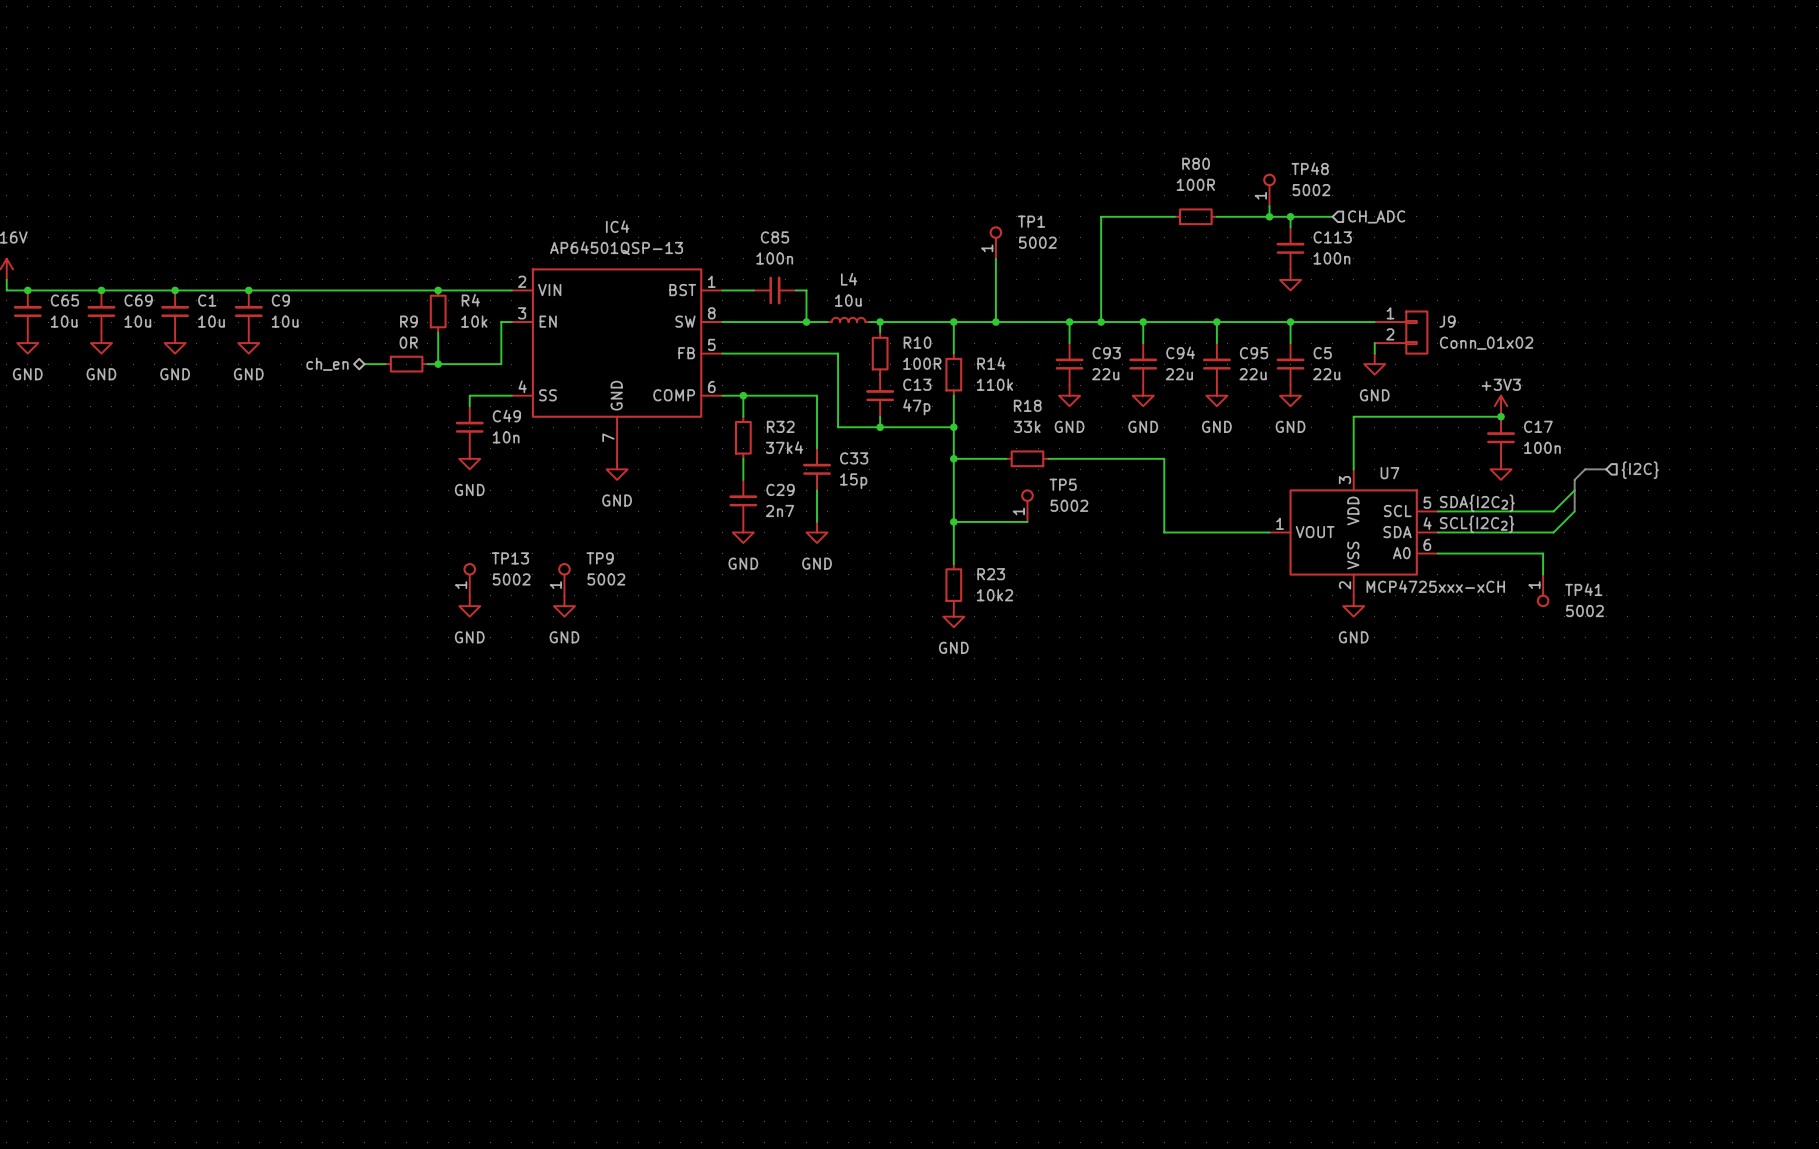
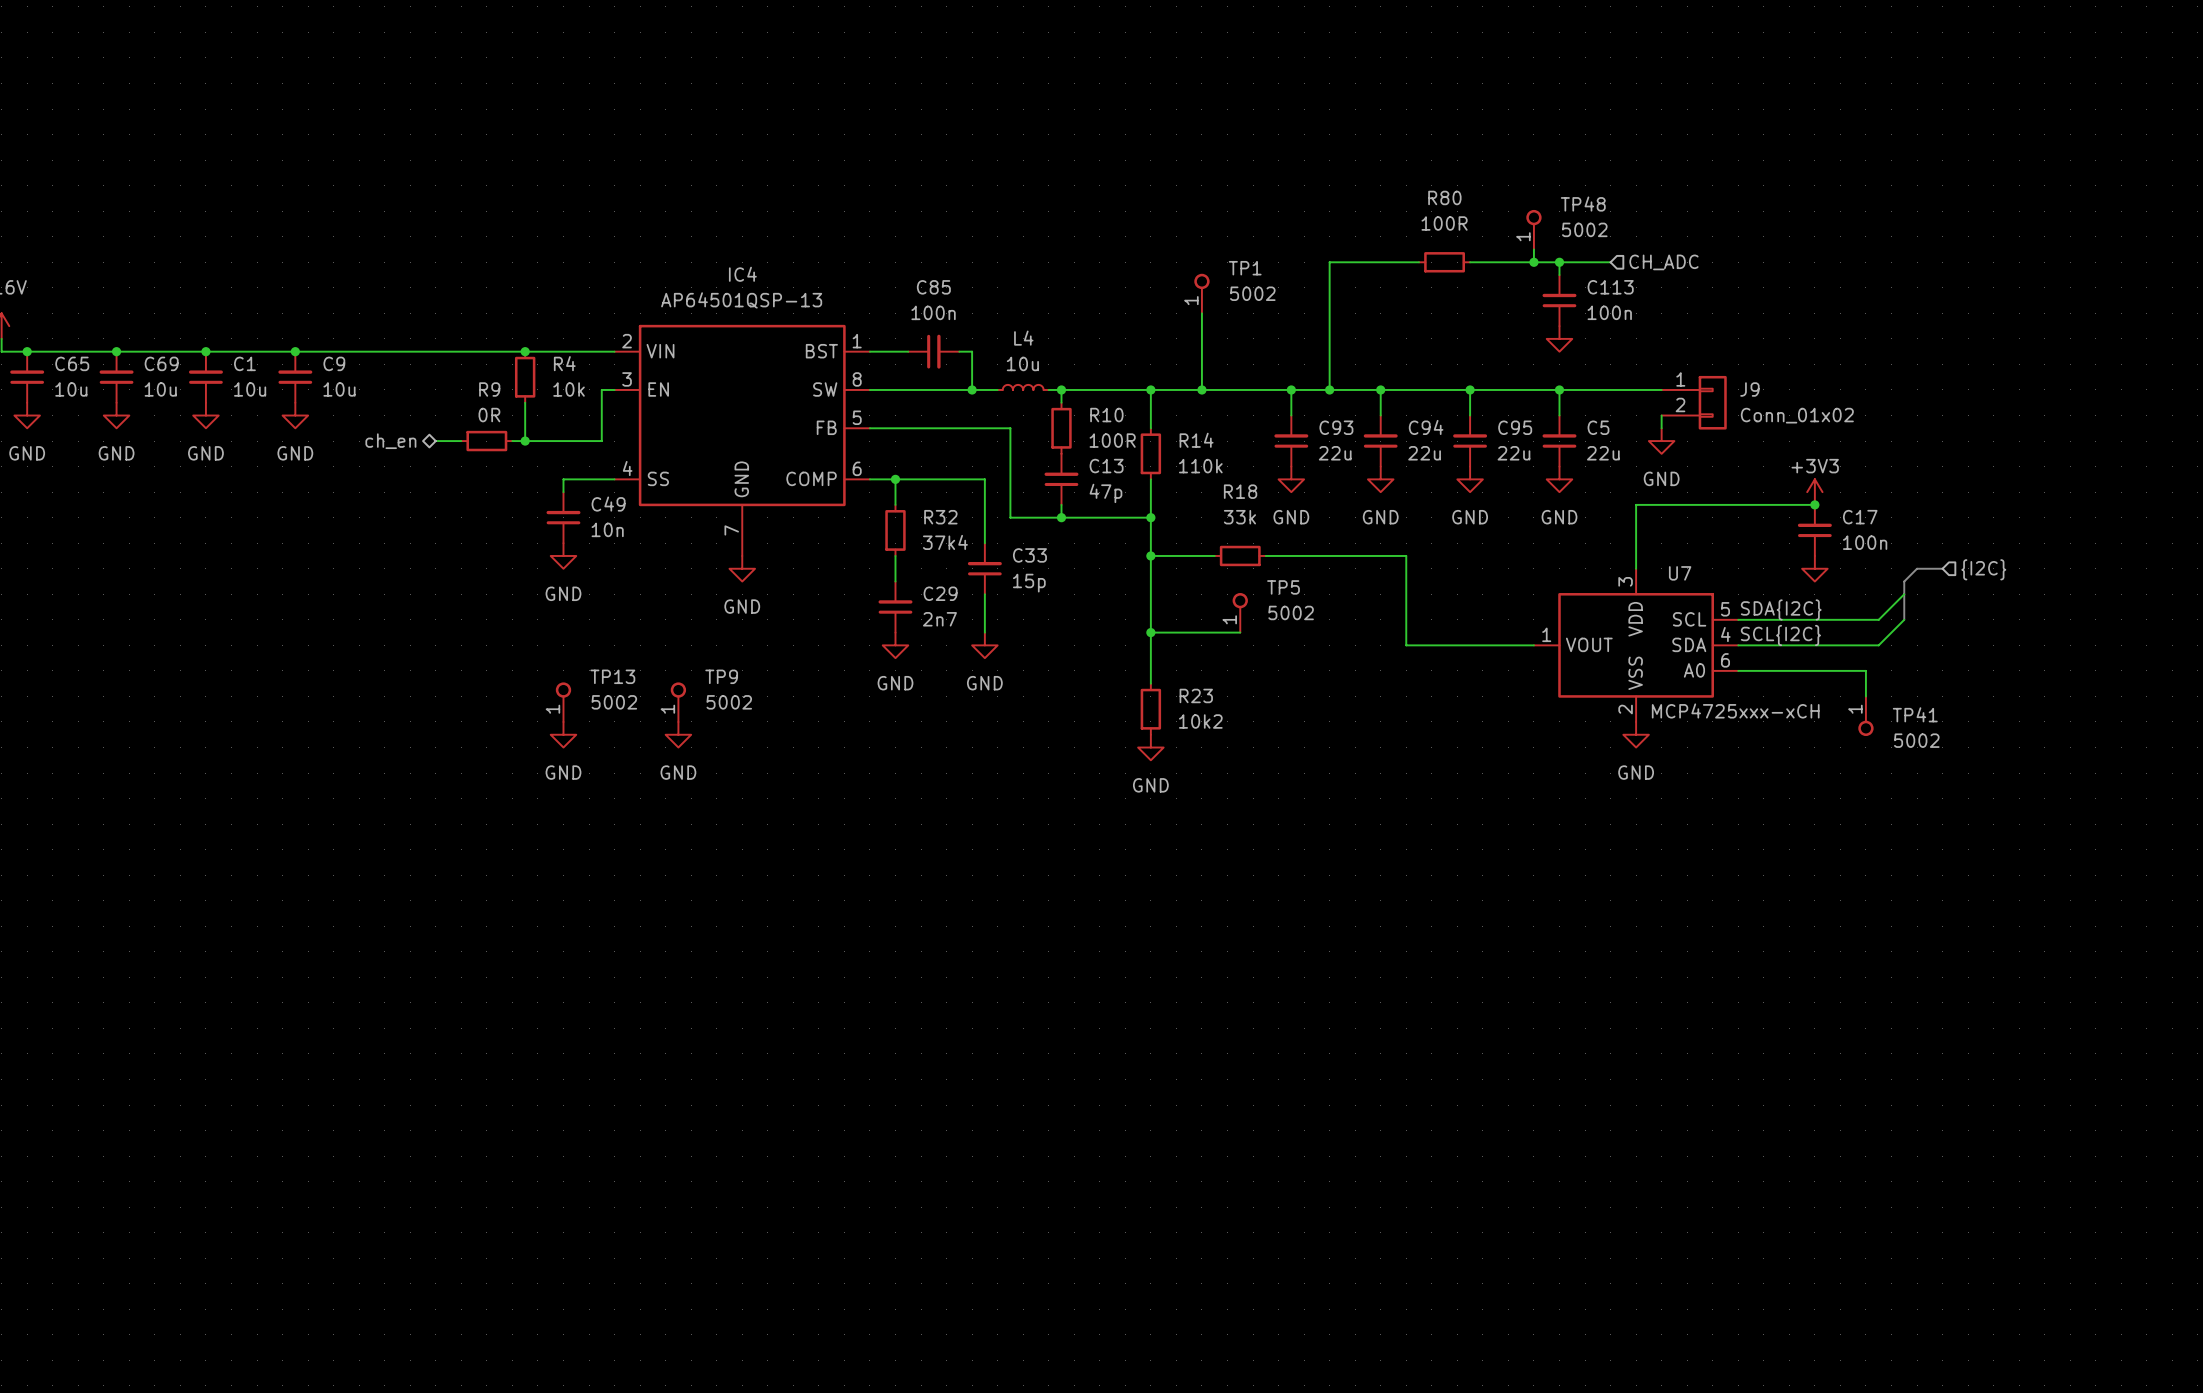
label: SDA{I2C2} (1477, 503) -> SDA{I2C} (1781, 609)
label: SCL{I2C2} (1477, 524) -> SCL{I2C} (1780, 635)

